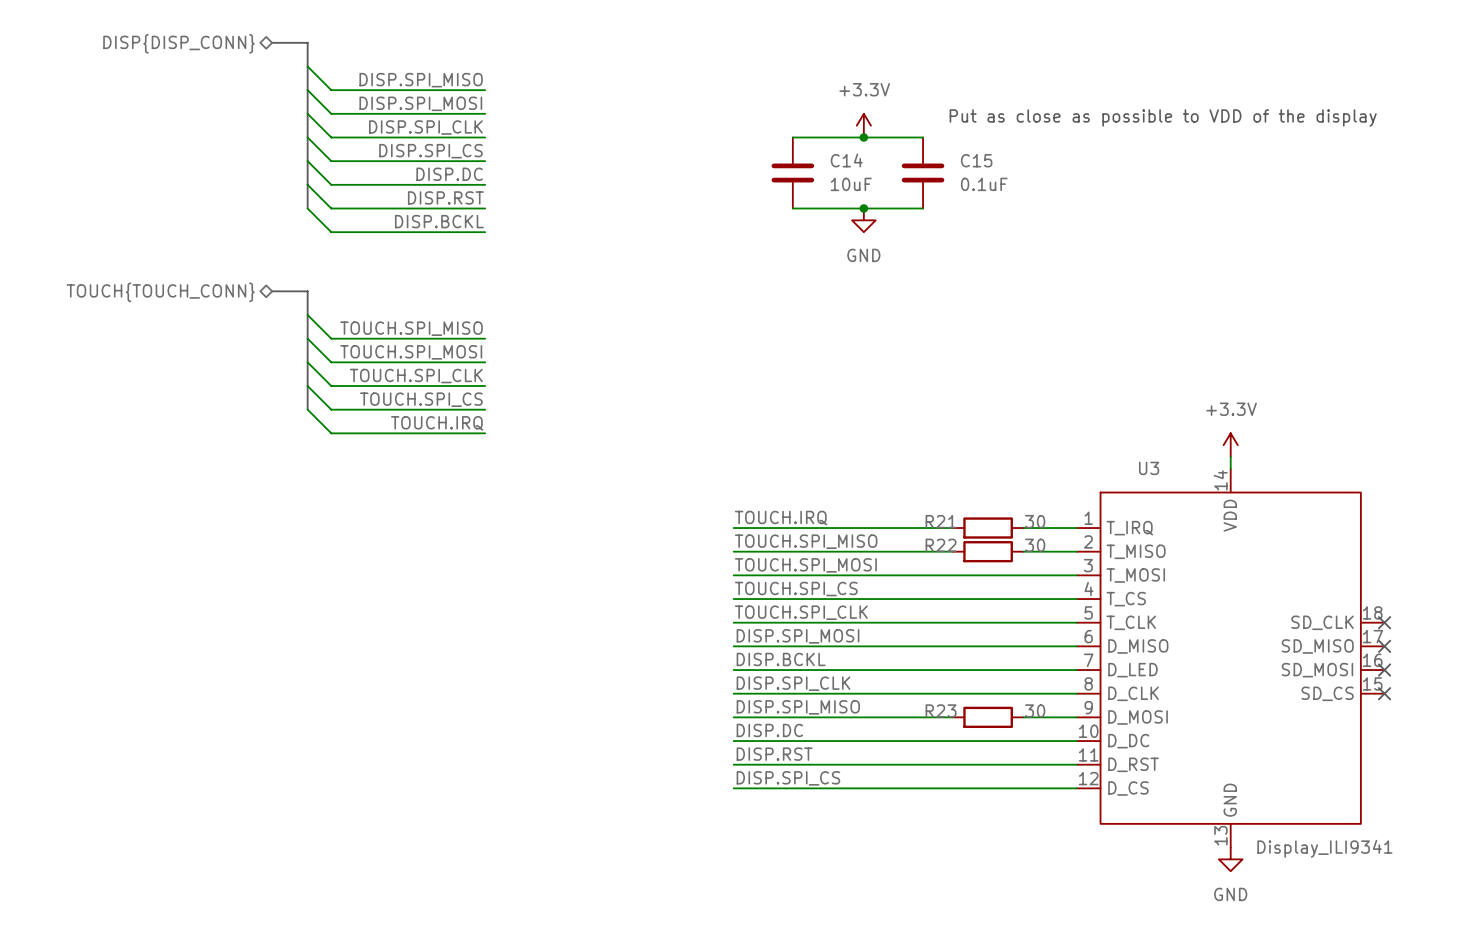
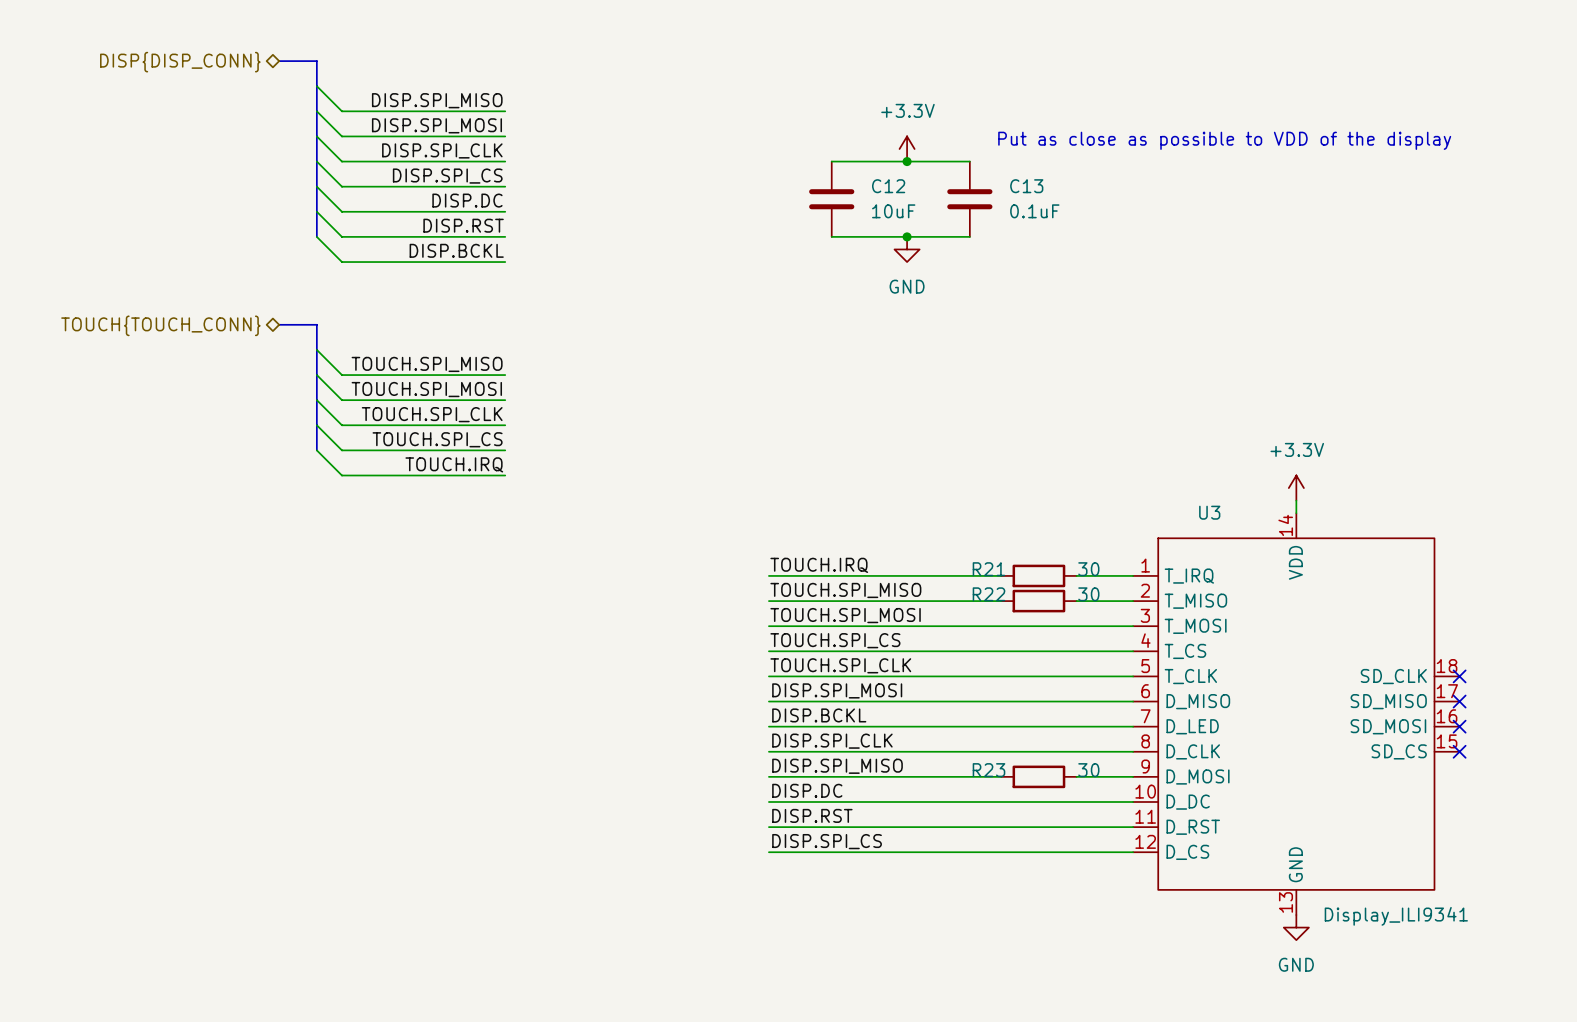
C14 name: C14 (846, 160) -> C12 (888, 186)
C15 name: C15 (976, 160) -> C13 (1026, 186)

